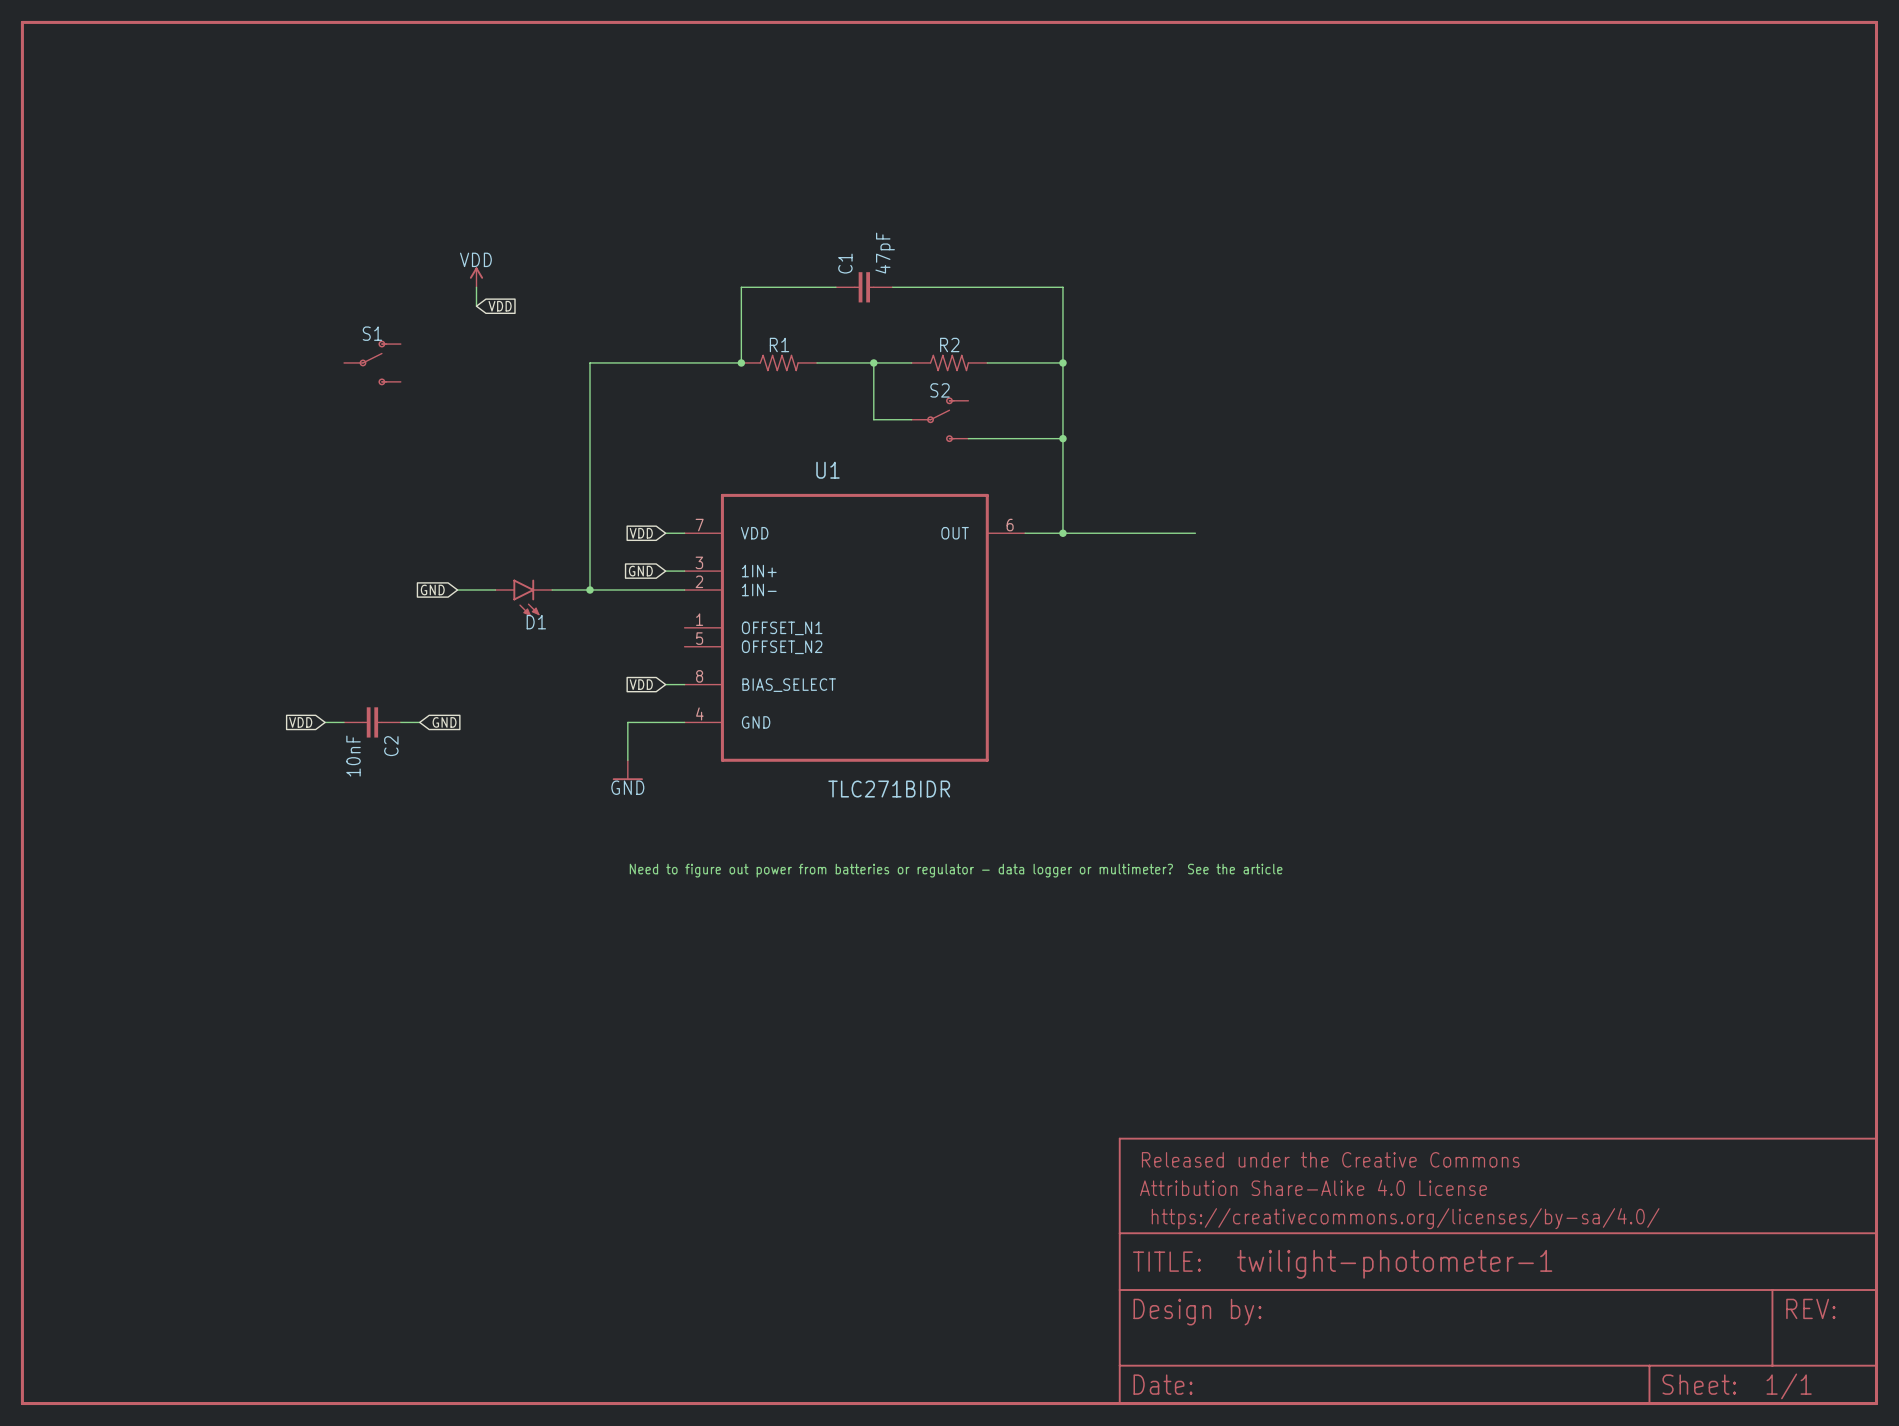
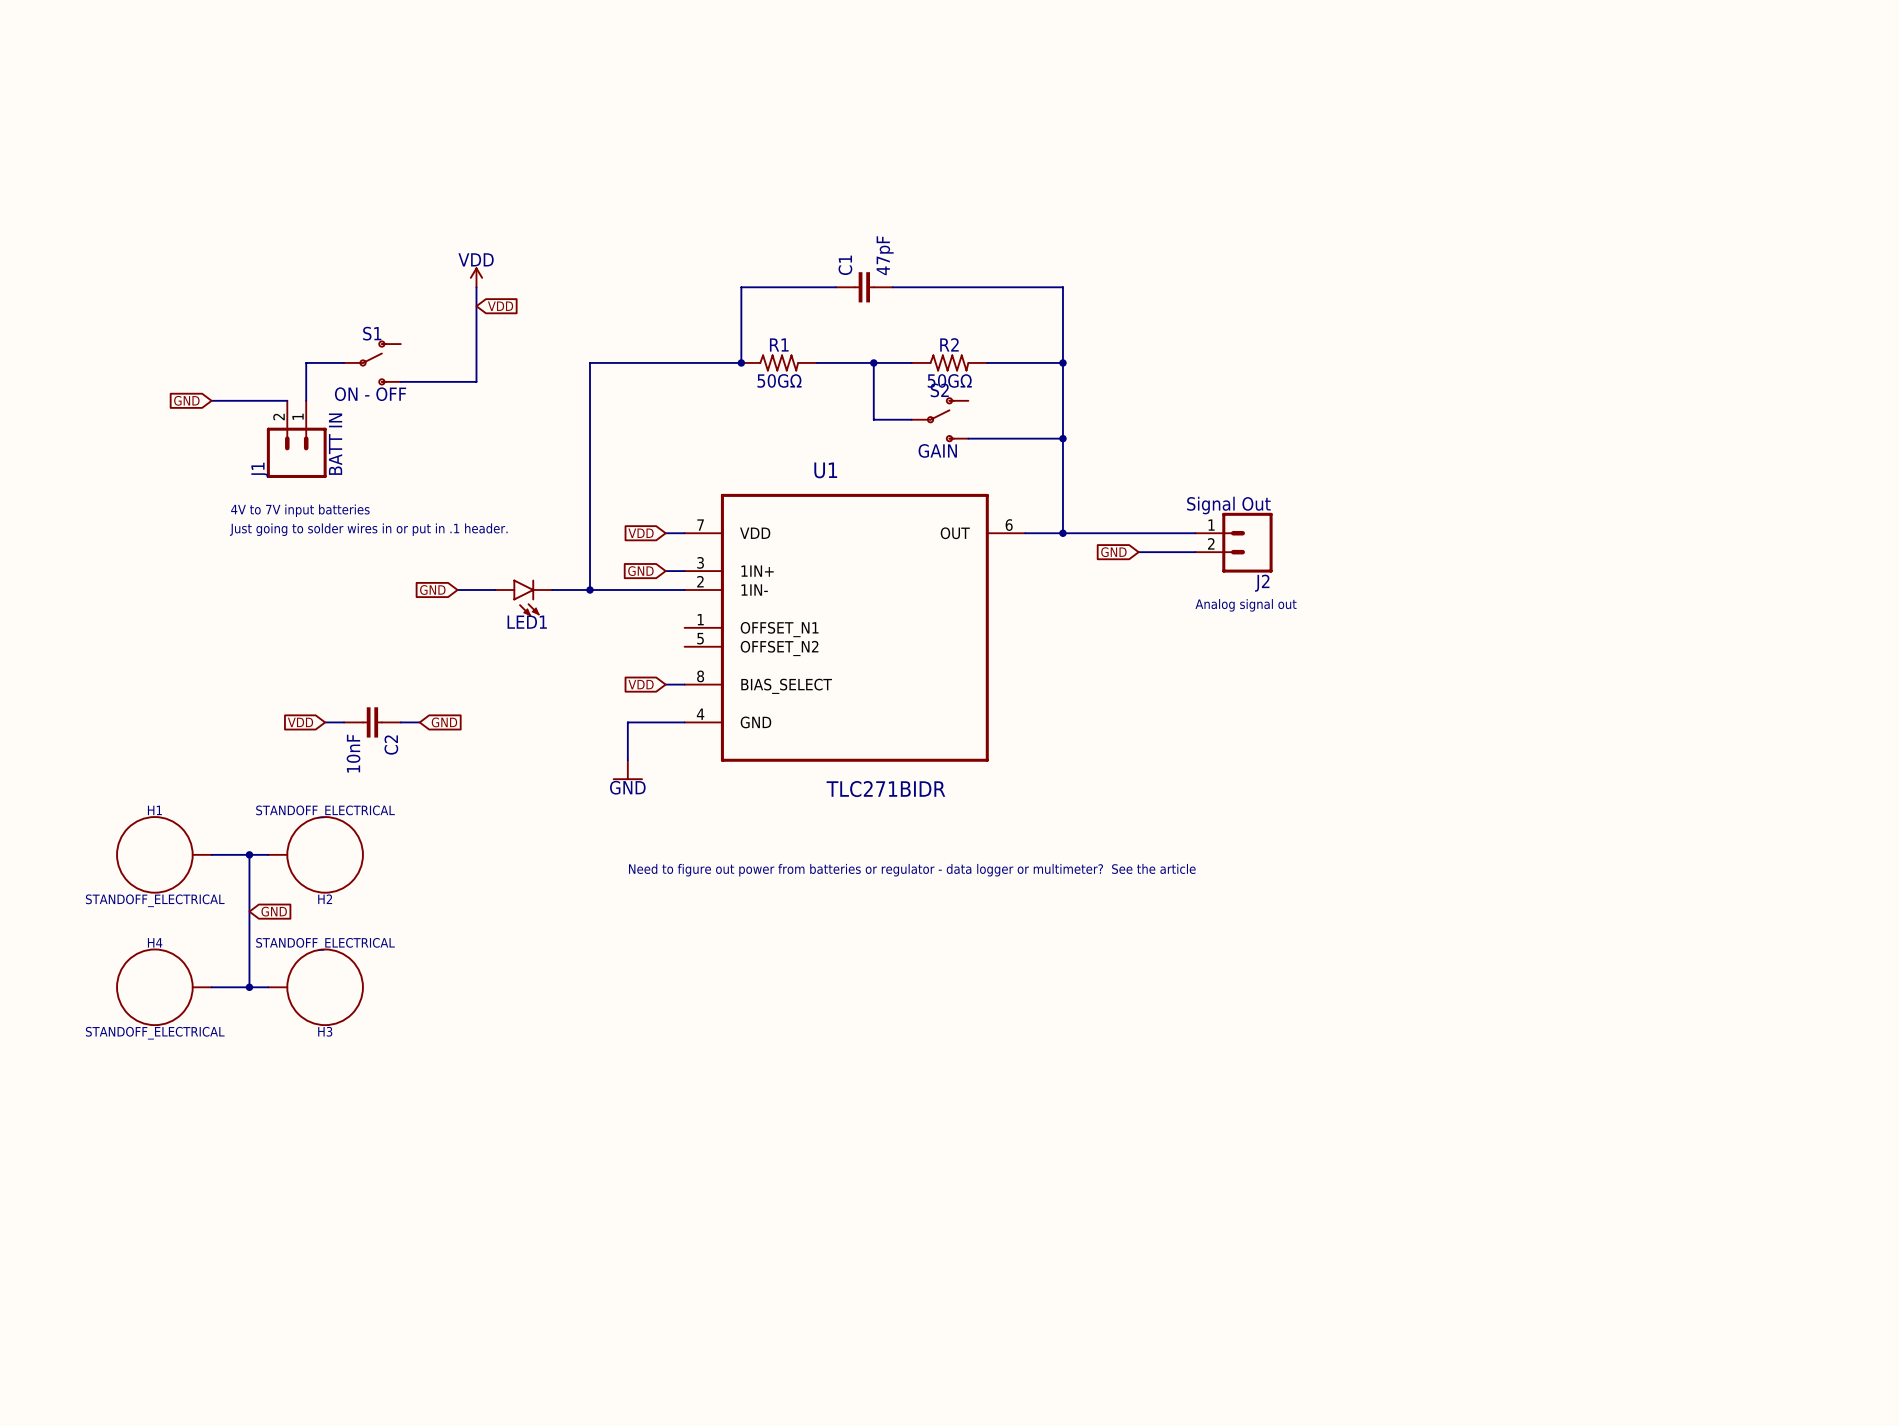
wire: none -> (476, 306) (476, 381) (400, 381)
wire: none -> (344, 362) (306, 362) (306, 400)
R1 value: none -> 50GΩ (779, 380)
R2 value: none -> 50GΩ (949, 380)
S1 value: none -> ON - OFF (370, 394)
global label: none -> GND (186, 400)
wire: none -> (211, 400) (287, 400)
J1: none -> BATT IN (296, 439)
S2 value: none -> GAIN (937, 450)
text: none -> 4V to 7V input batteries (300, 510)
text: none -> Just going to solder wires in or put in .1 header. (368, 529)
J2: none -> Signal Out (1234, 542)
global label: none -> GND (1113, 552)
wire: none -> (1138, 552) (1195, 552)
text: none -> Analog signal out (1246, 605)
D1 name: D1 (536, 622) -> LED1 (527, 622)
part: (949, 712) -> none
H1: none -> STANDOFF_ELECTRICAL (163, 854)
wire: none -> (211, 854) (268, 854)
wire: none -> (249, 854) (249, 987)
junction: none -> (249, 854)
H2: none -> STANDOFF_ELECTRICAL (316, 854)
global label: none -> GND (274, 911)
H4: none -> STANDOFF_ELECTRICAL (163, 987)
wire: none -> (211, 987) (268, 987)
junction: none -> (249, 987)
H3: none -> STANDOFF_ELECTRICAL (316, 987)
part: (1498, 1271) -> none

